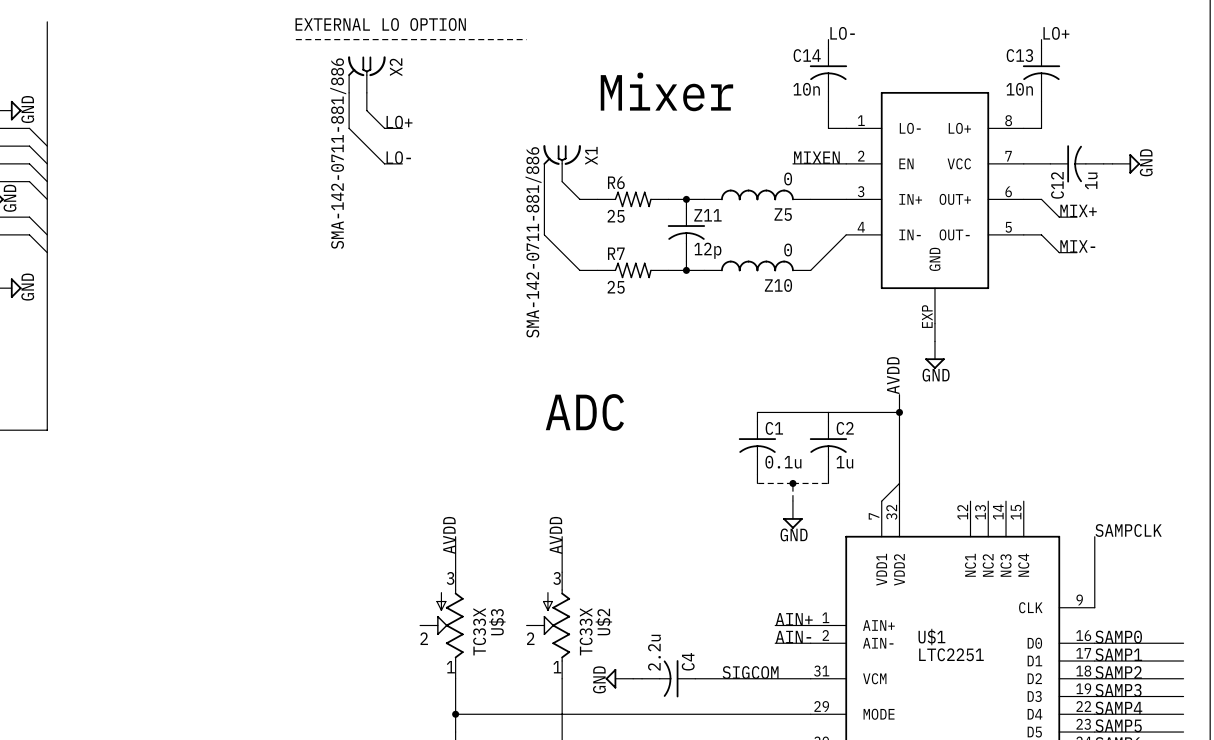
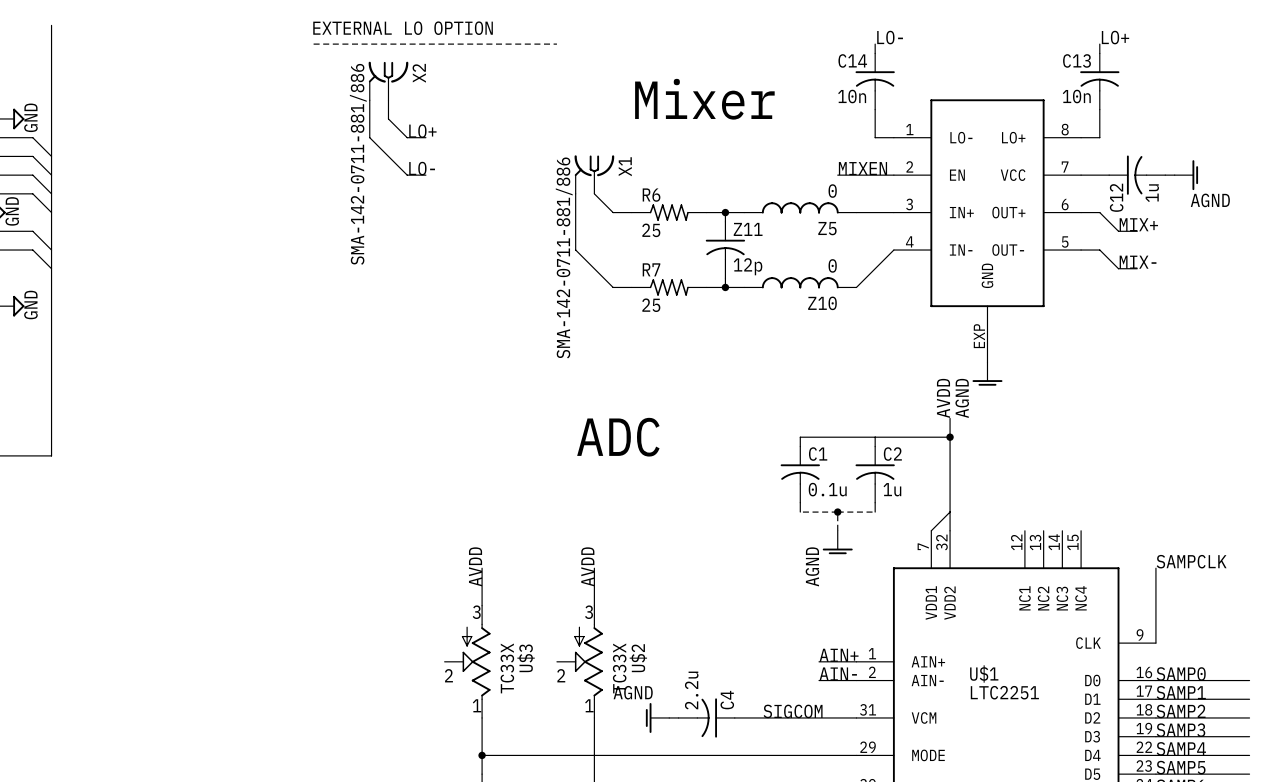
power symbol: GND (1126, 163) -> AGND (1186, 175)
power symbol: GND (934, 355) -> AGND (987, 374)
power symbol: GND (792, 514) -> AGND (837, 542)
power symbol: GND (619, 678) -> AGND (657, 717)

